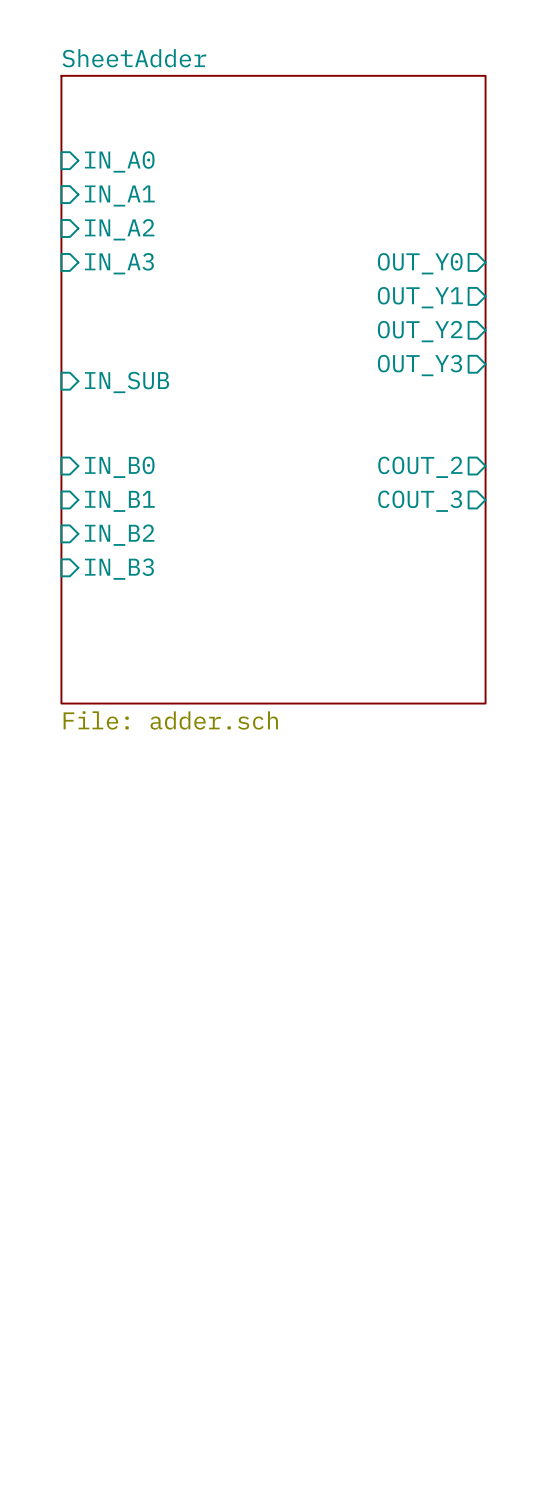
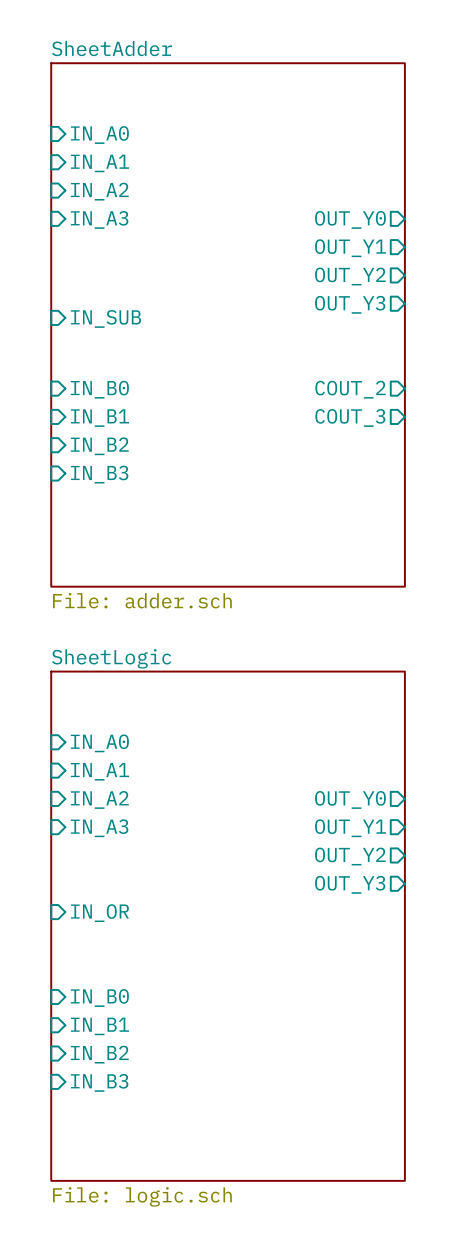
sheet pin: none -> IN_A0 (99, 743)
sheet pin: none -> IN_A1 (99, 771)
sheet pin: none -> IN_A2 (99, 799)
sheet pin: none -> OUT_Y0 (350, 799)
sheet pin: none -> IN_A3 (99, 828)
sheet pin: none -> OUT_Y1 (350, 828)
sheet pin: none -> OUT_Y2 (350, 856)
sheet pin: none -> OUT_Y3 (350, 884)
sheet pin: none -> IN_OR (99, 913)
sheet SheetLogic: none -> File: logic.sch (228, 926)
sheet pin: none -> IN_B0 (99, 998)
sheet pin: none -> IN_B1 (99, 1026)
sheet pin: none -> IN_B2 (99, 1054)
sheet pin: none -> IN_B3 (99, 1082)

